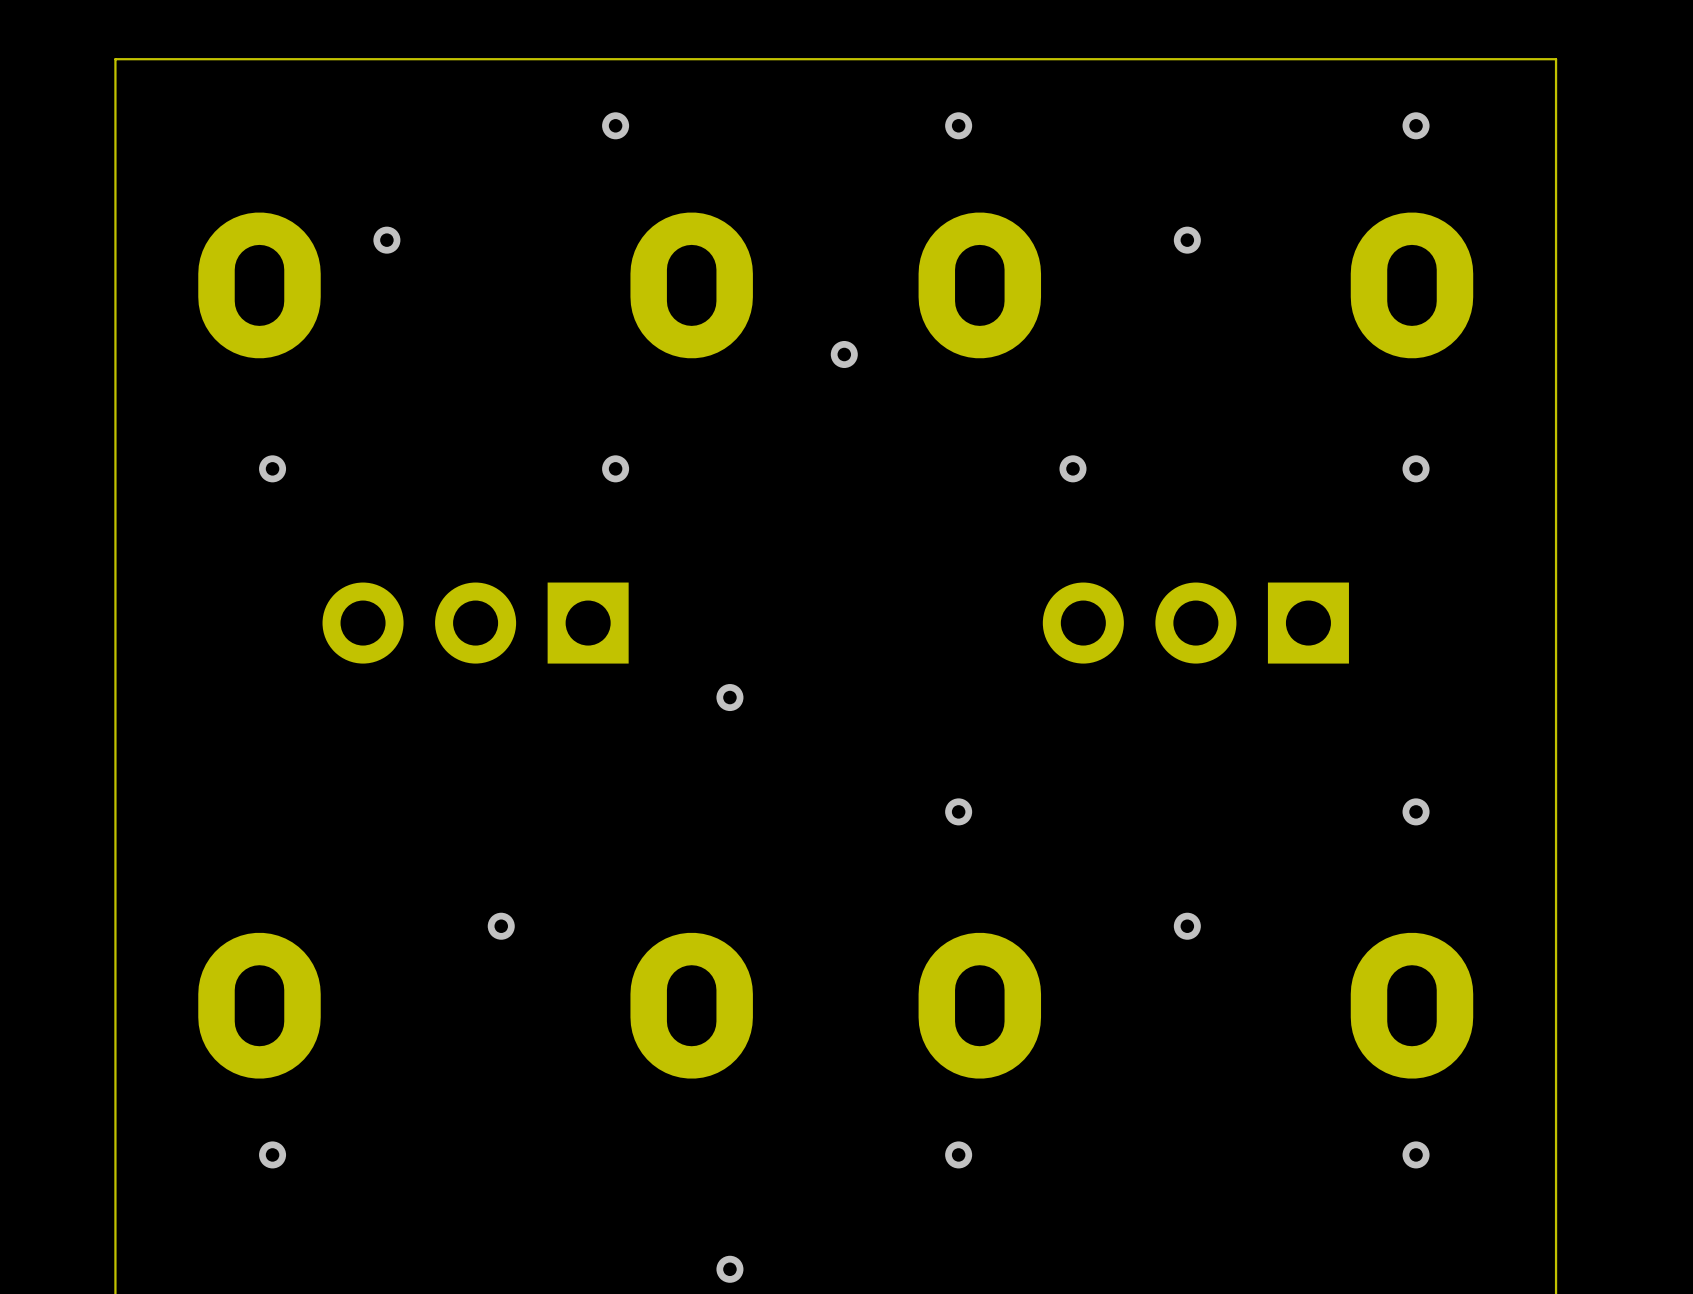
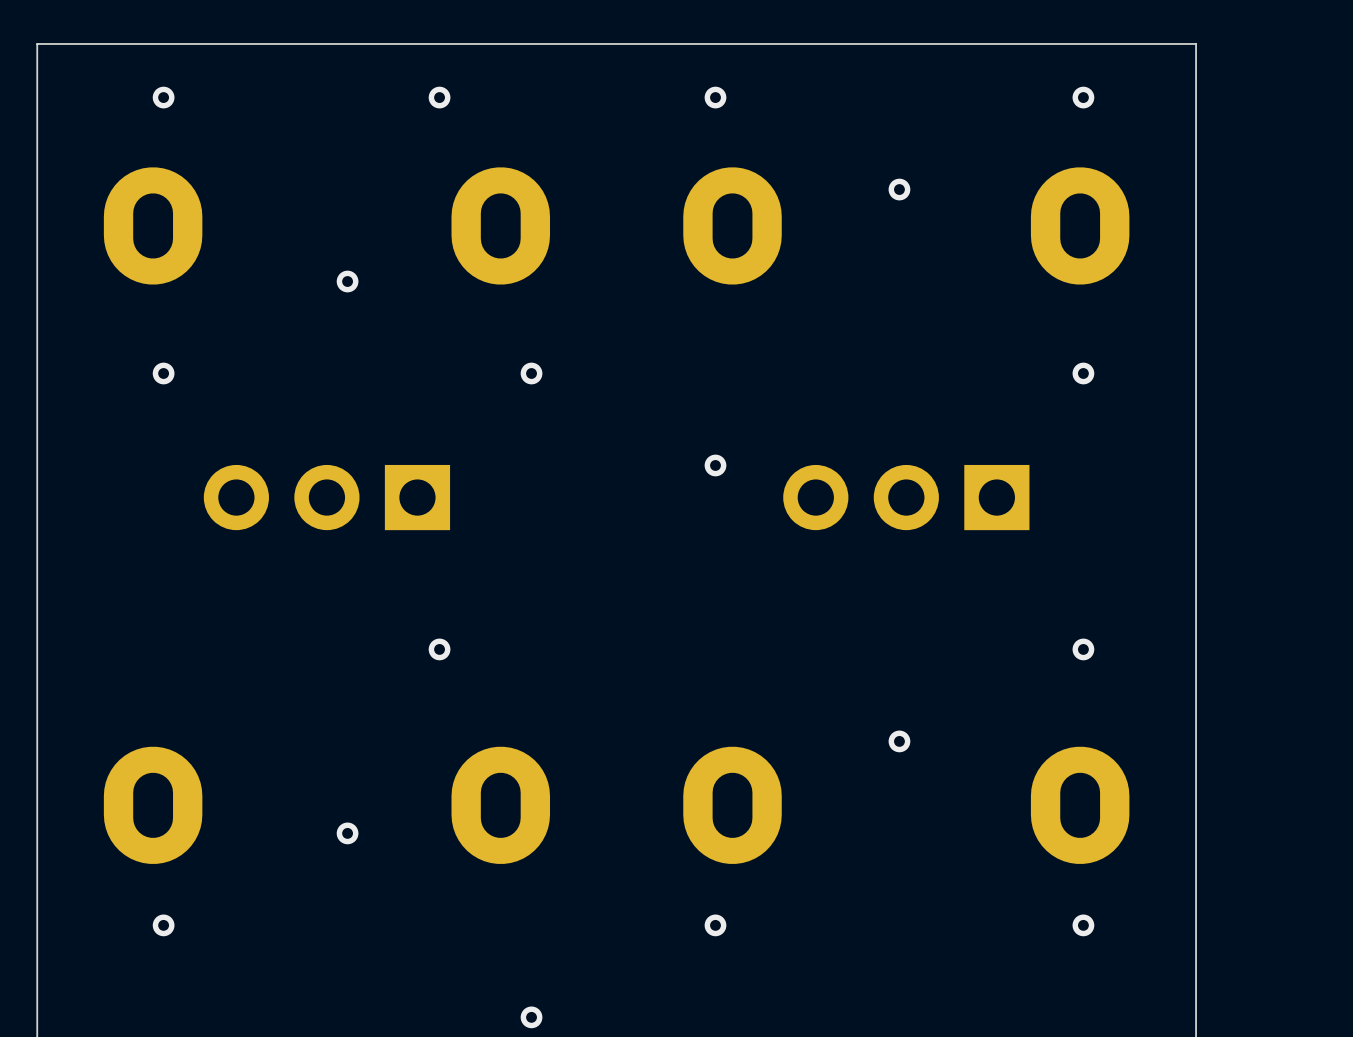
via: none -> (163, 97)
via: (386, 240) -> none
via: none -> (347, 281)
via: (844, 354) -> none
via: (615, 468) -> none
via: none -> (531, 373)
via: (1072, 468) -> none
via: none -> (715, 465)
via: (729, 697) -> none
via: none -> (439, 649)
via: (958, 811) -> none
via: (501, 926) -> none
via: none -> (347, 833)

